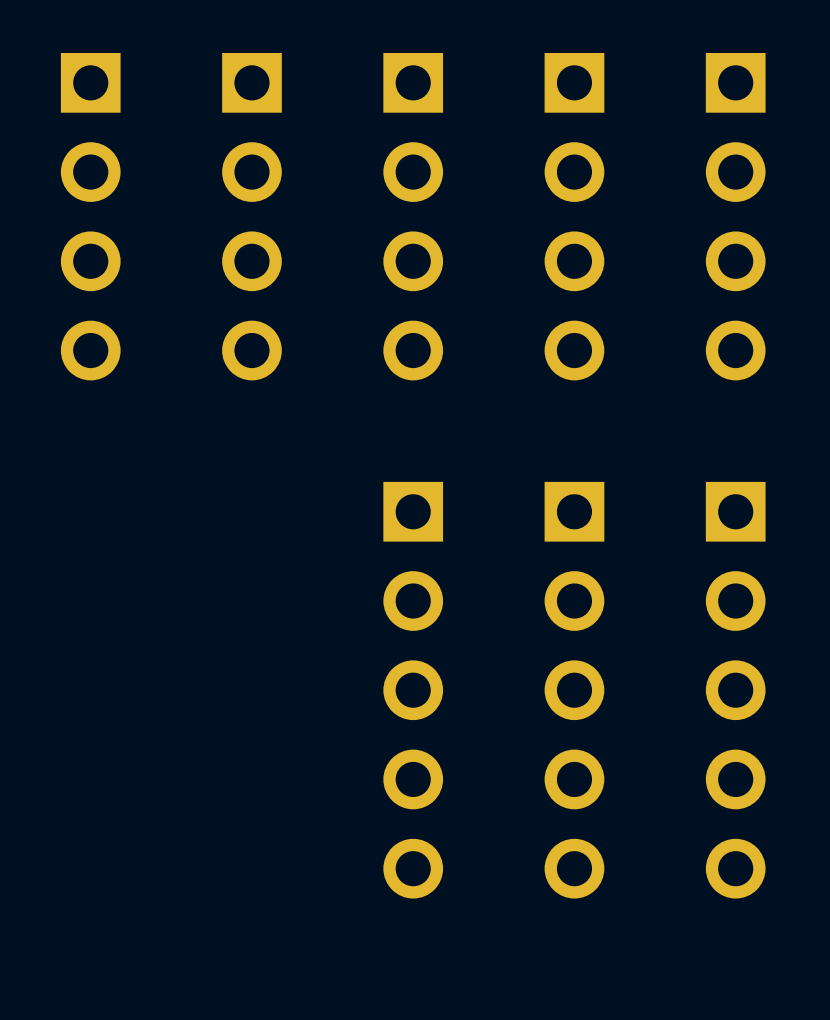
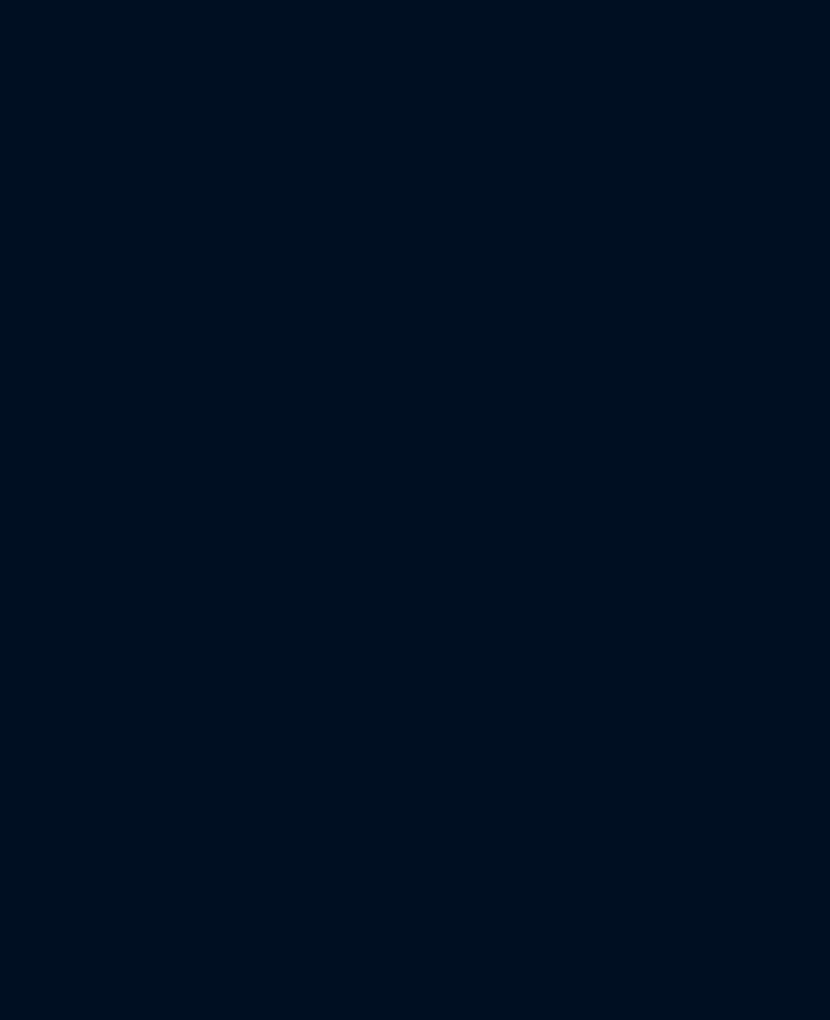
part: (90, 216) -> none
part: (251, 216) -> none
part: (413, 216) -> none
part: (574, 216) -> none
part: (735, 216) -> none
part: (413, 690) -> none
part: (574, 690) -> none
part: (735, 690) -> none

